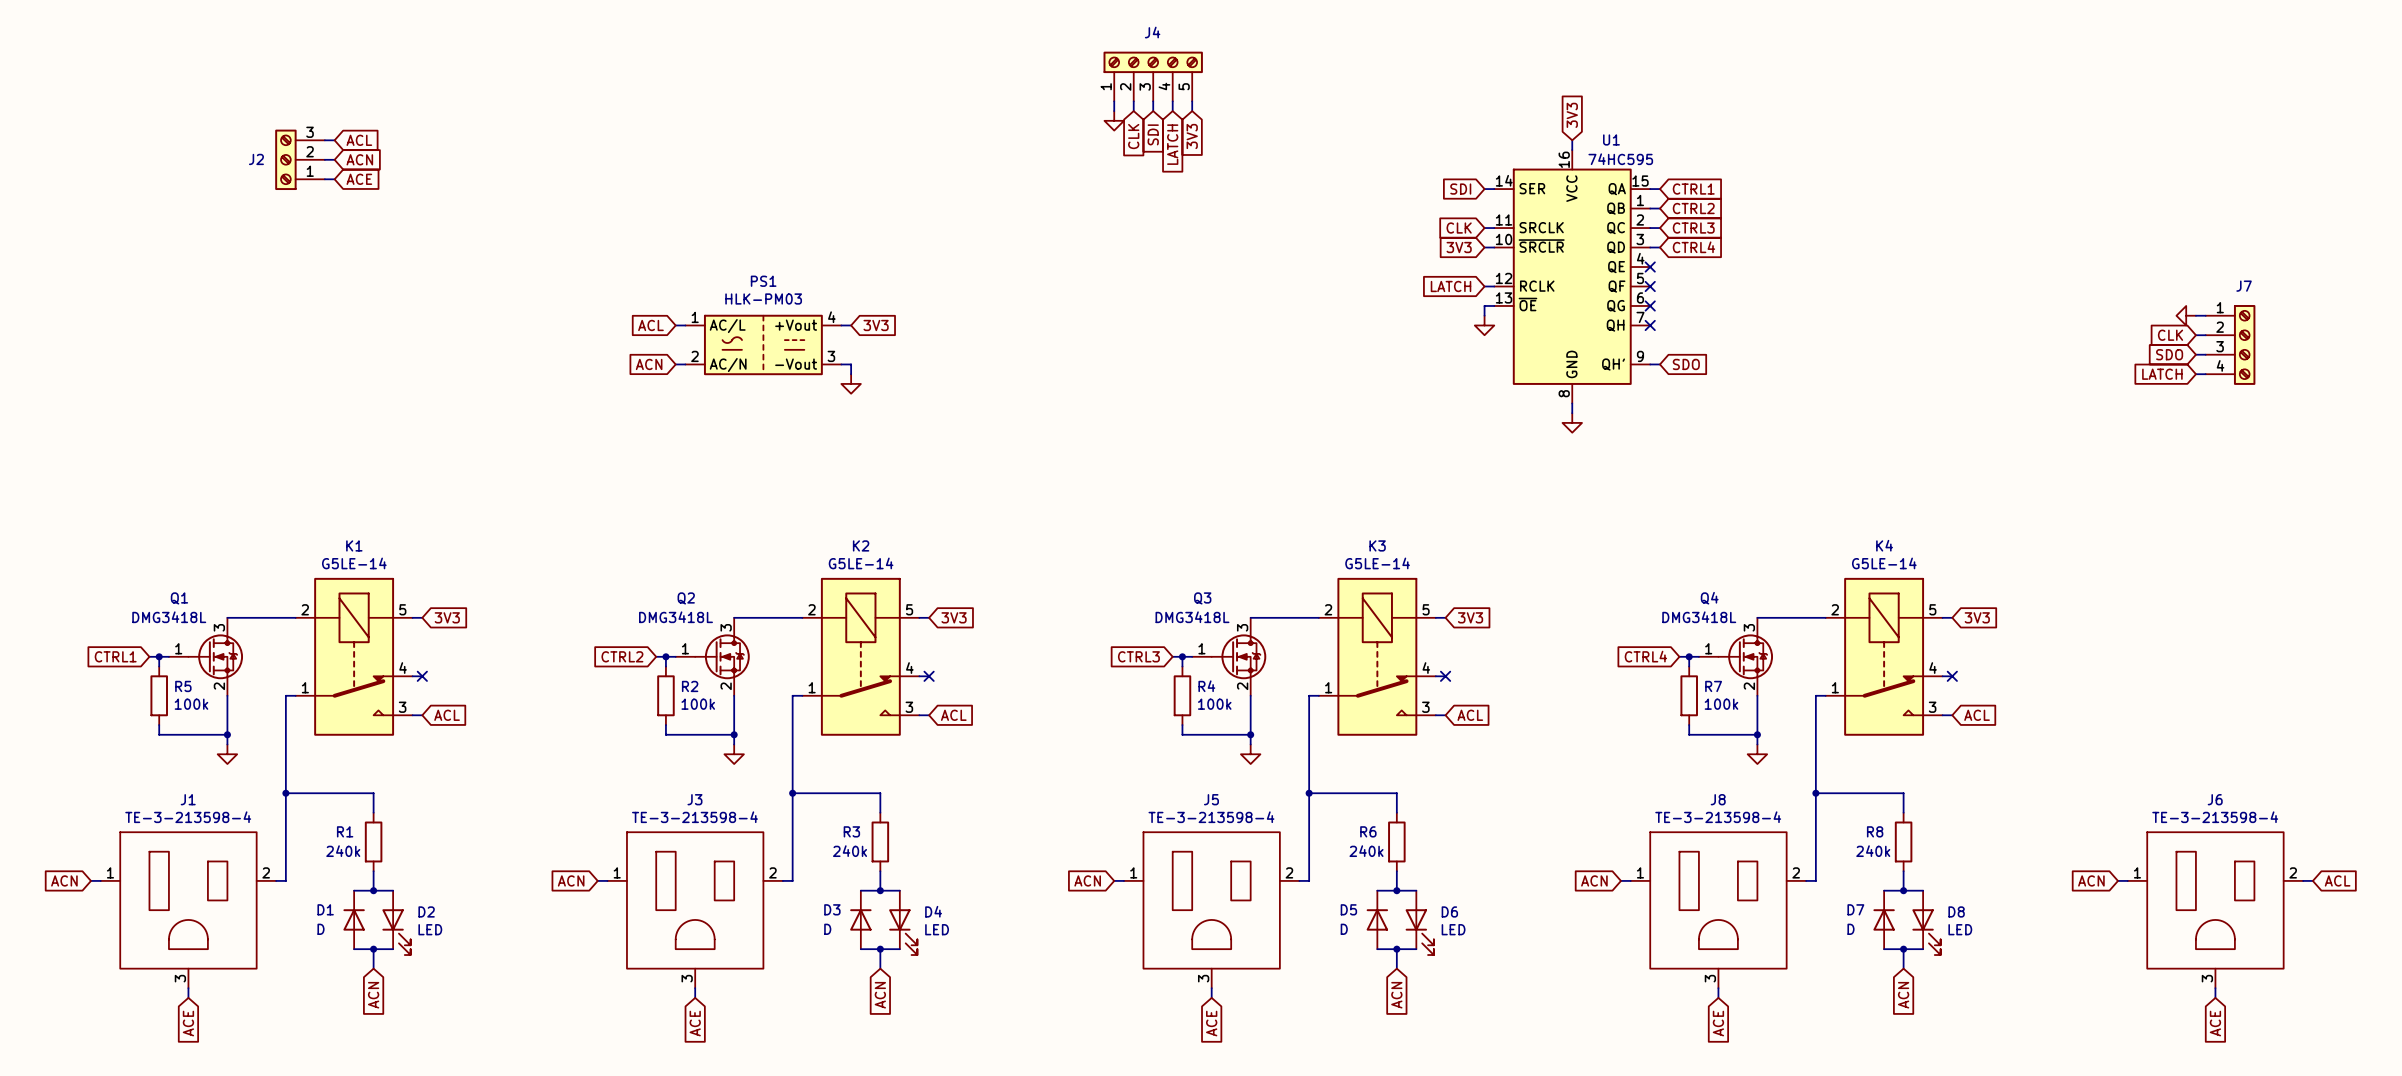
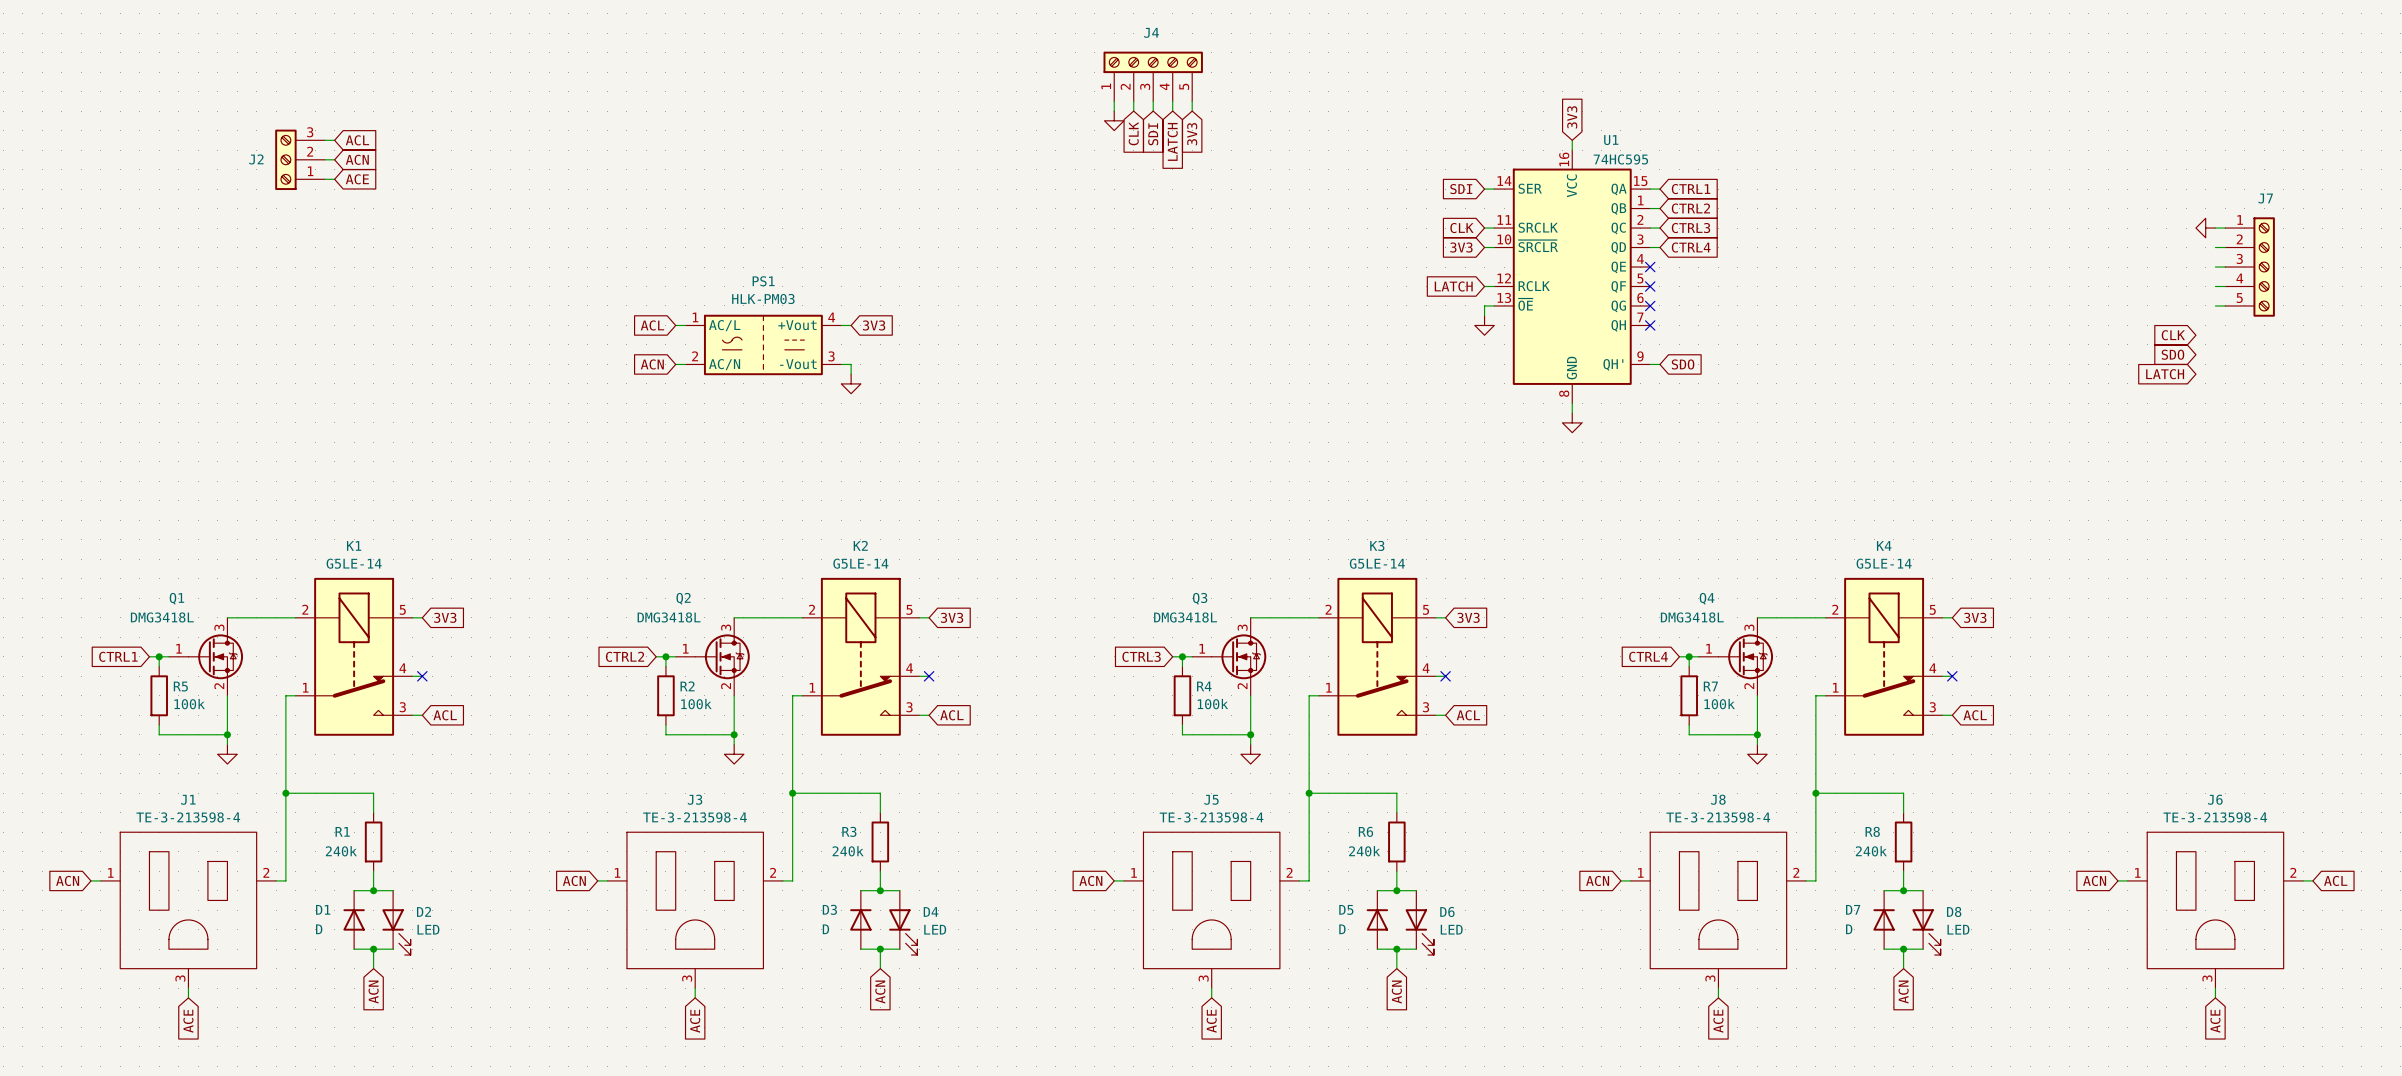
wire: none -> (2215, 228) (2225, 228)
J7 symbol: [2205, 305, 2256, 385] -> [2225, 217, 2275, 317]
power symbol position: (2186, 315) -> (2205, 228)
wire: (2195, 315) (2205, 315) -> (2215, 247) (2225, 247)
wire: (2195, 335) (2205, 335) -> (2215, 267) (2225, 267)
wire: (2195, 354) (2205, 354) -> (2215, 286) (2225, 286)
wire: (2195, 374) (2205, 374) -> (2215, 305) (2225, 305)

